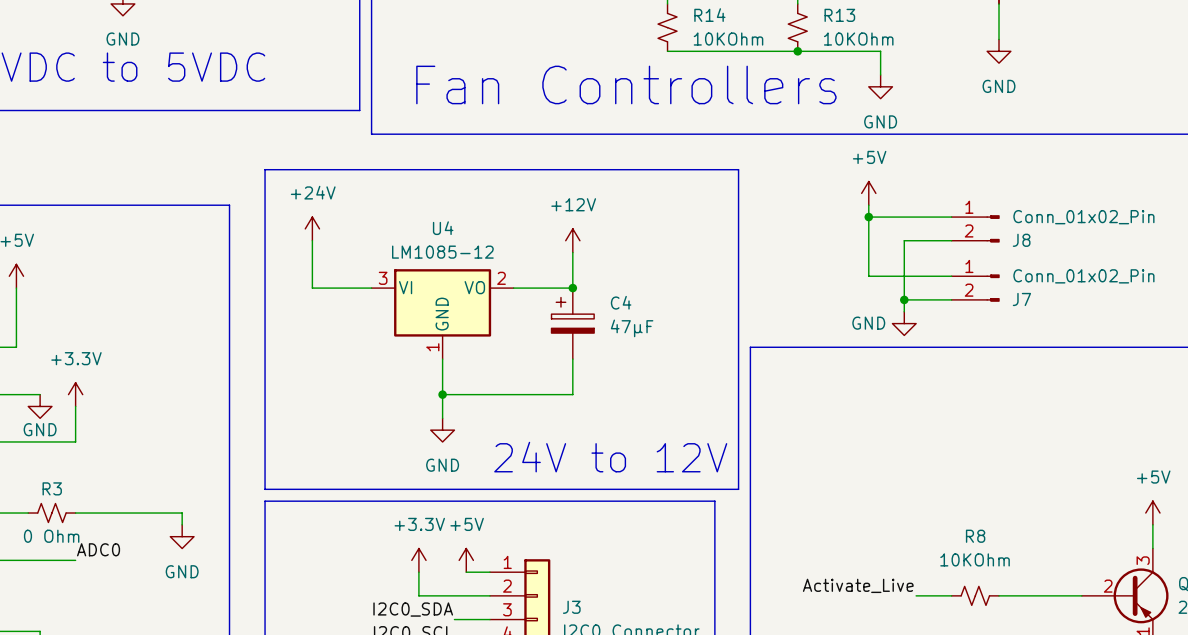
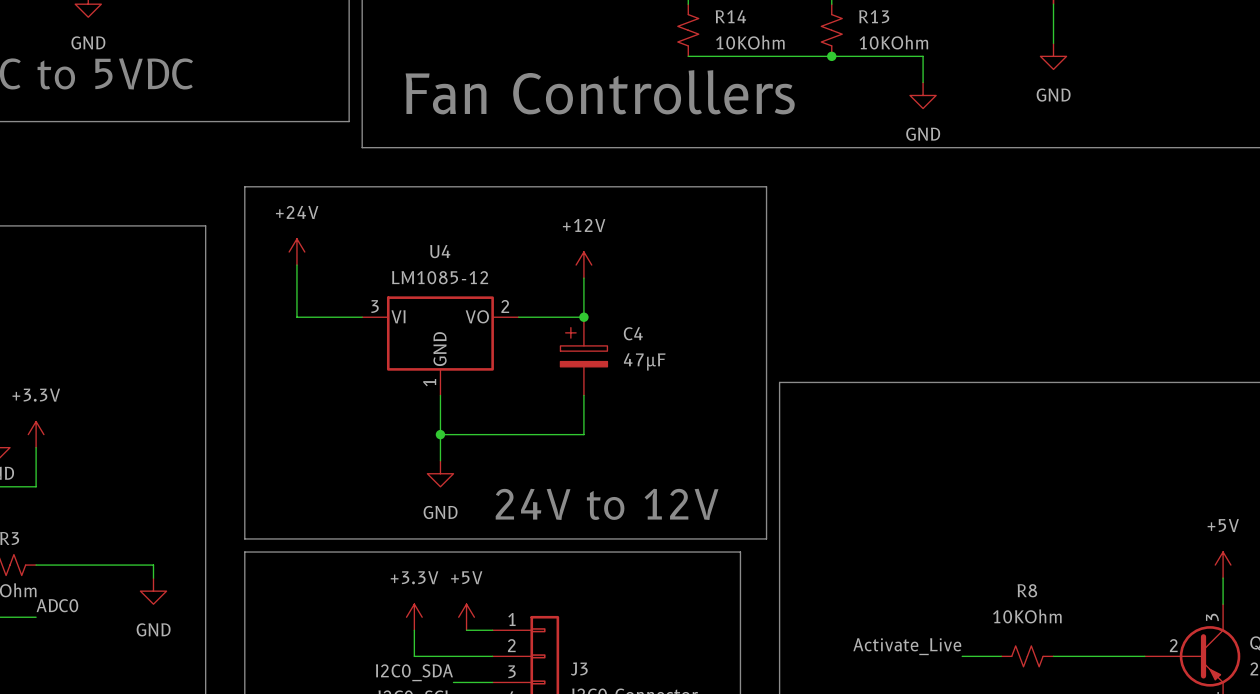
power symbol: +5V (868, 193) -> none
wire: (868, 205) (868, 276) (951, 276) -> none
wire: (868, 217) (951, 217) -> none
junction: (868, 217) -> none
J8: Conn_01x02_Pin (975, 228) -> none
wire: (951, 240) (904, 240) (904, 311) -> none
J7: Conn_01x02_Pin (975, 288) -> none
wire: (904, 299) (951, 299) -> none
junction: (904, 299) -> none
power symbol: GND (904, 323) -> none

